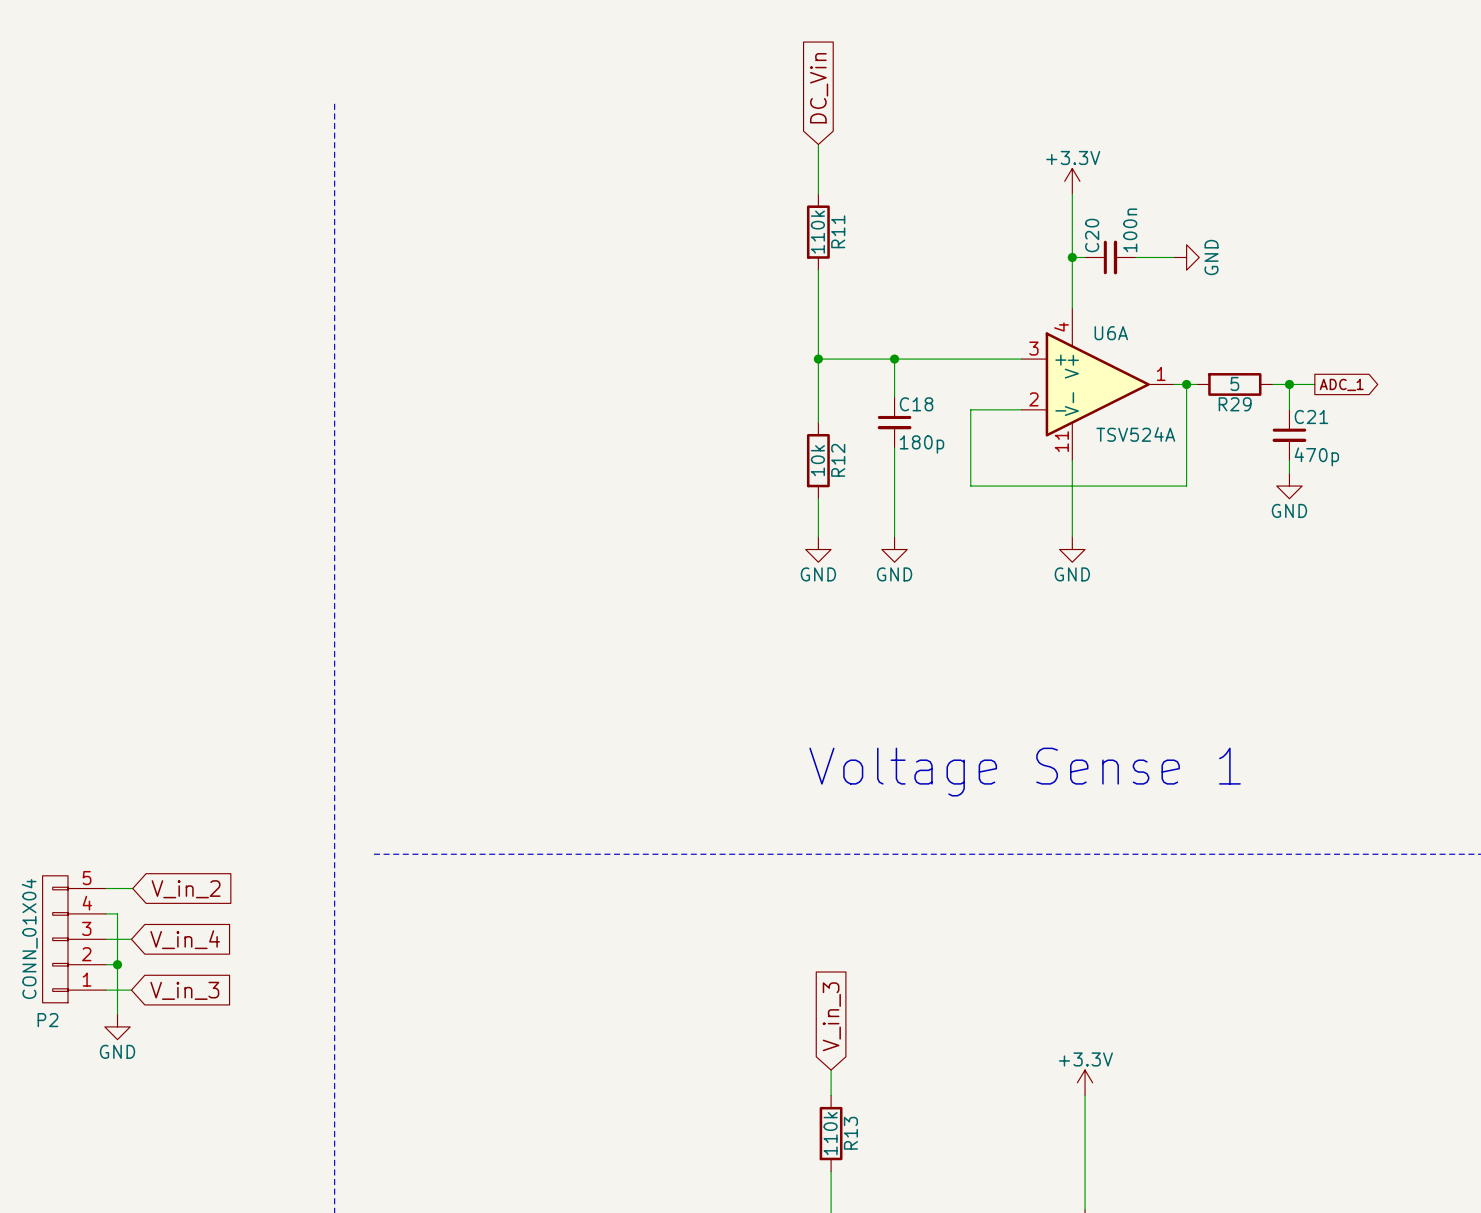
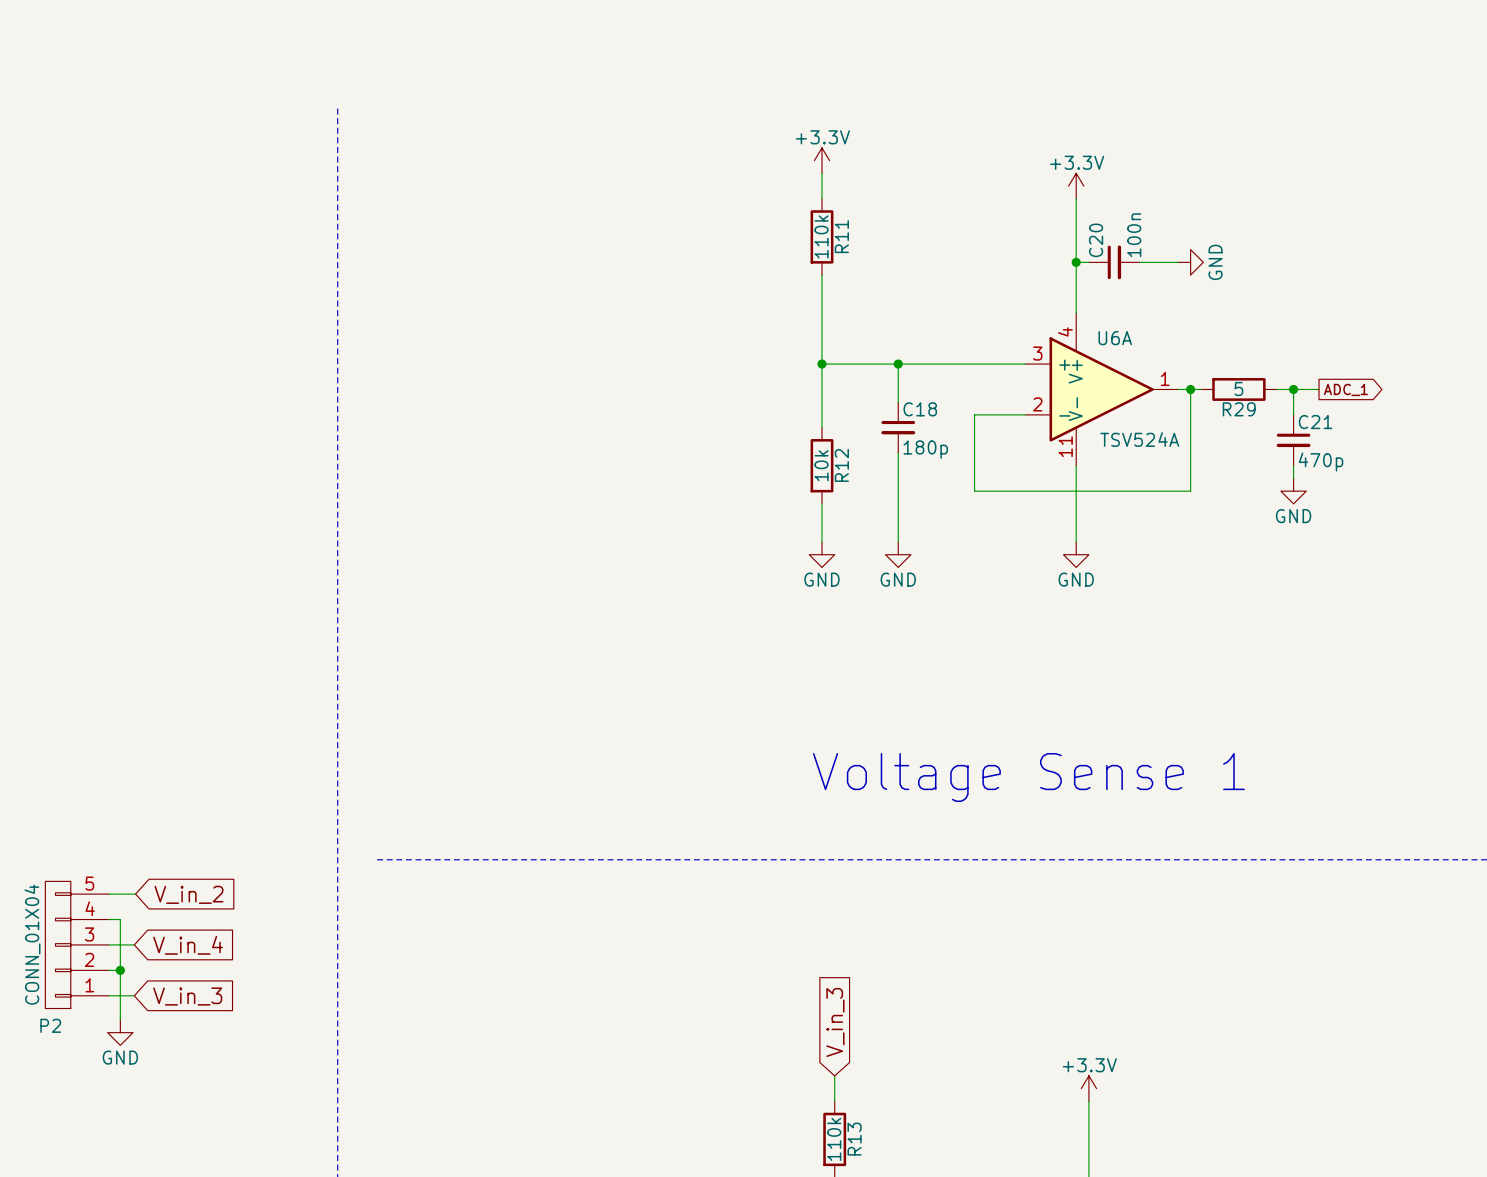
global label: DC_Vin (819, 88) -> none
power symbol: none -> +3.3V (822, 160)

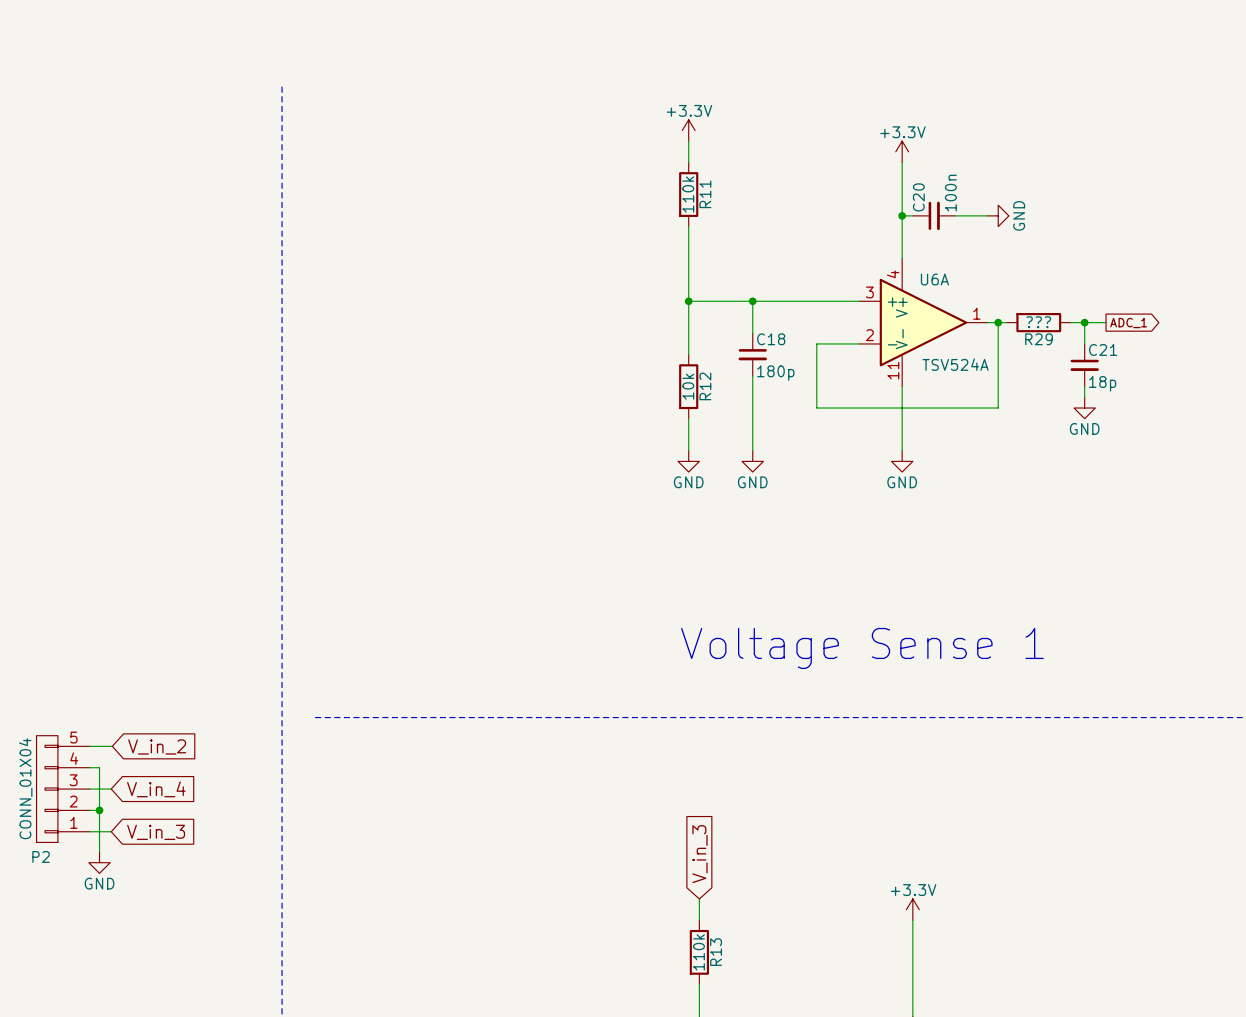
R29 value: 5 (1238, 389) -> ??? (1038, 322)
C21 value: 470p (1321, 461) -> 18p (1102, 383)

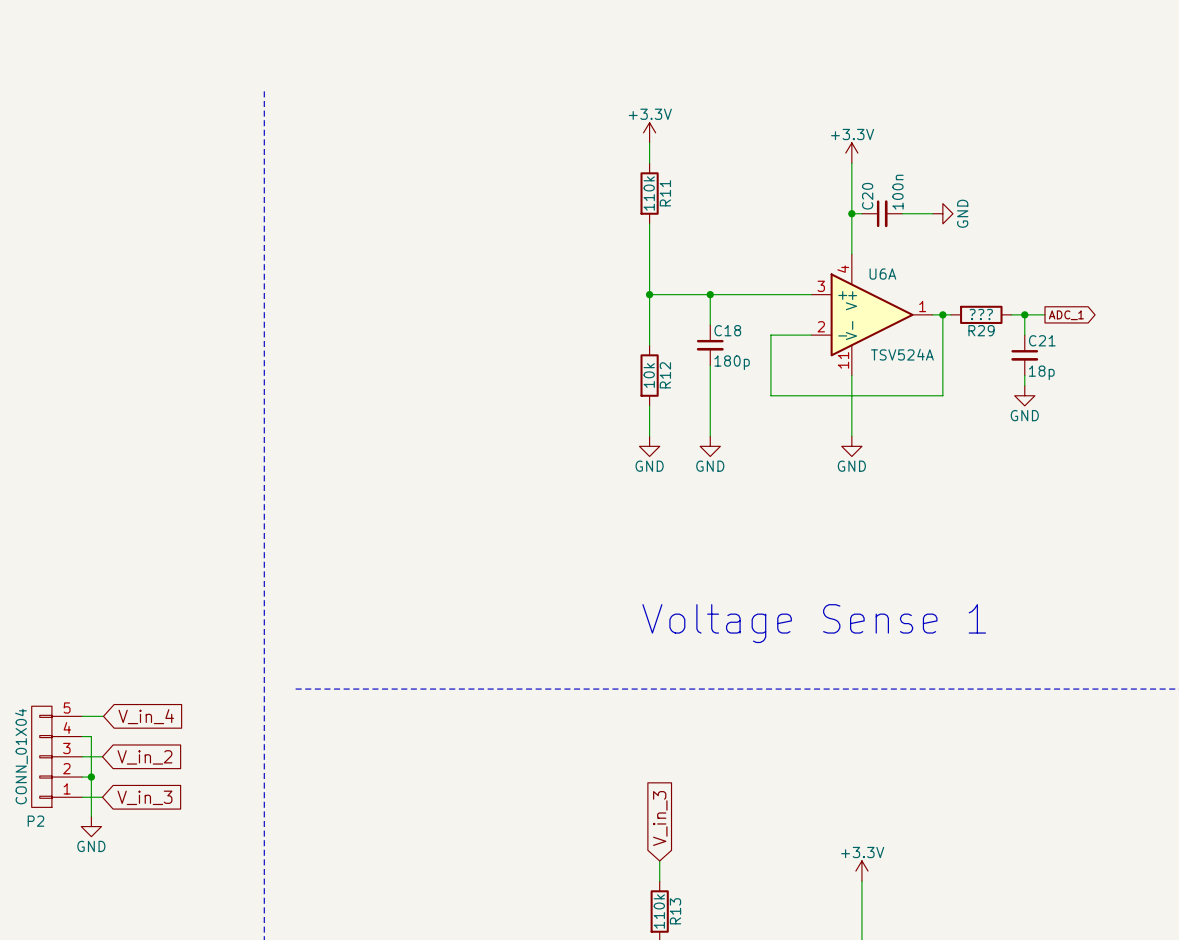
global label: V_in_2 (157, 746) -> V_in_4 (146, 716)
global label: V_in_4 (156, 789) -> V_in_2 (144, 757)

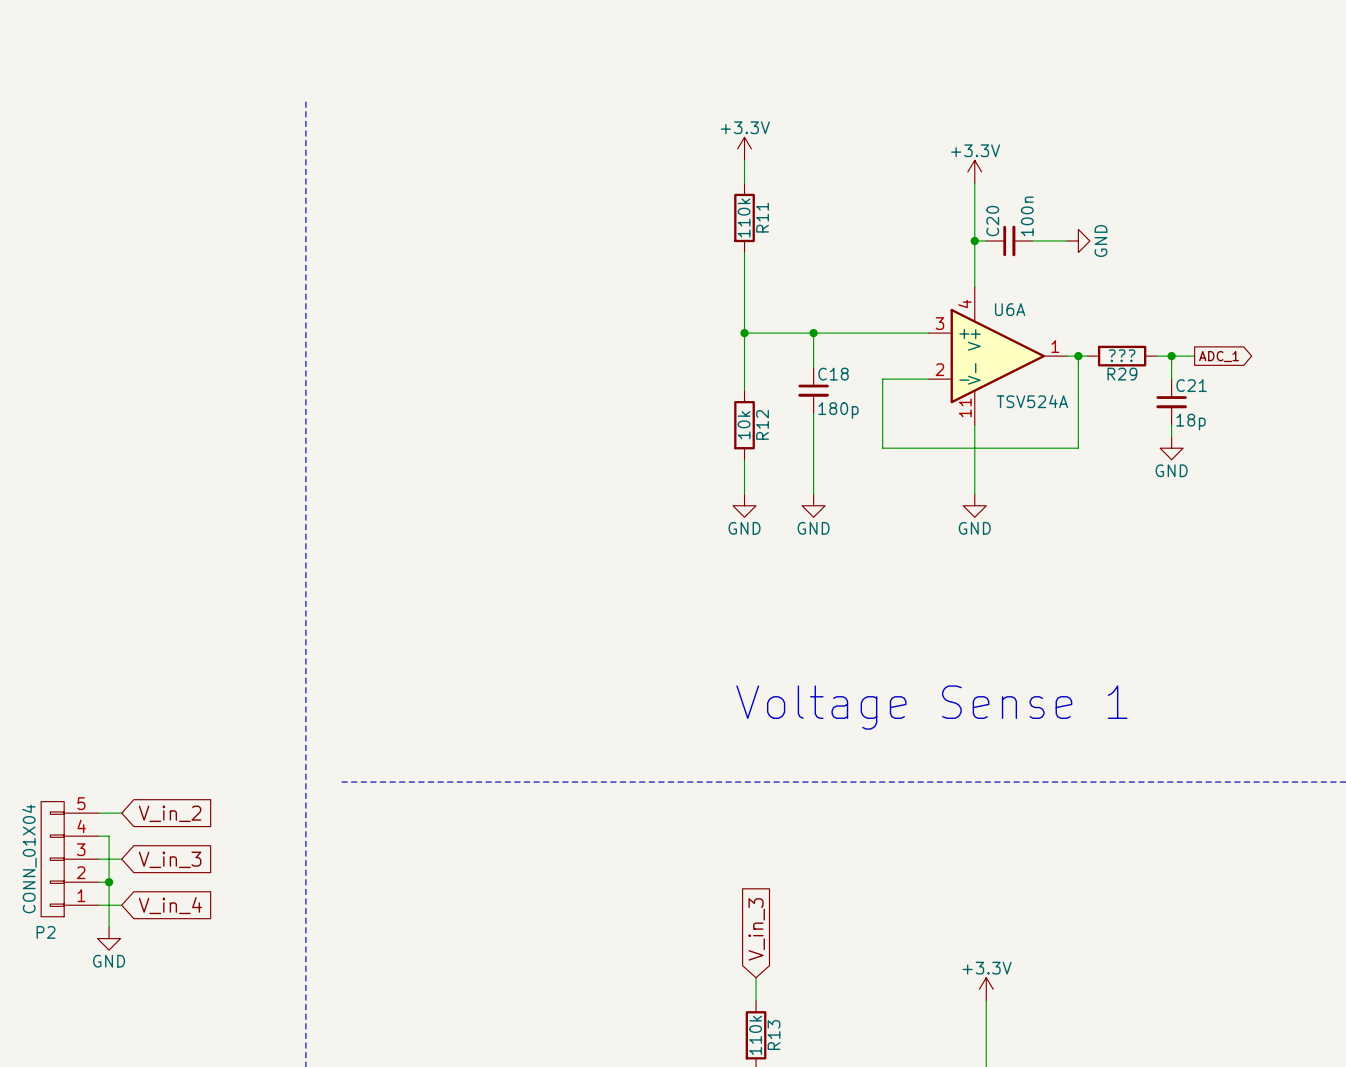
global label: V_in_4 (146, 716) -> V_in_2 (170, 813)
global label: V_in_2 (144, 757) -> V_in_3 (170, 859)
global label: V_in_3 (144, 797) -> V_in_4 (170, 905)

